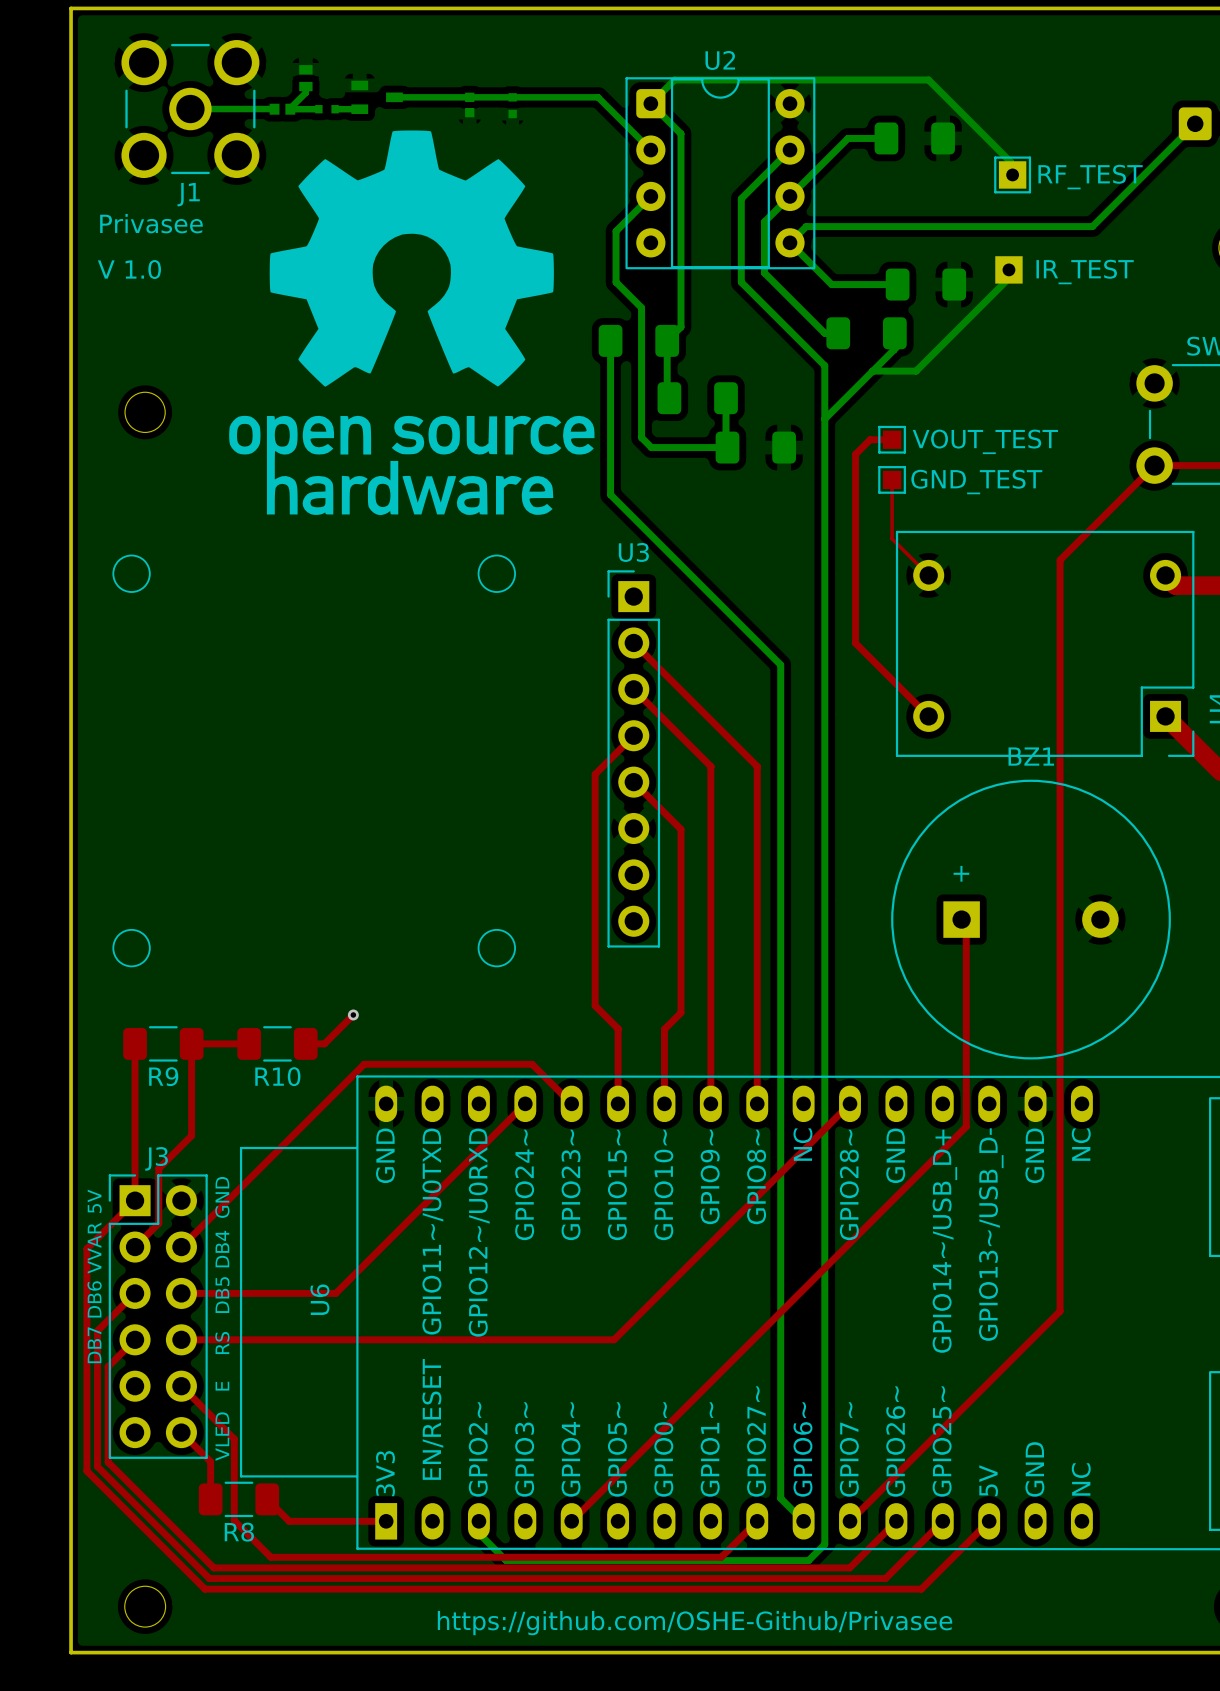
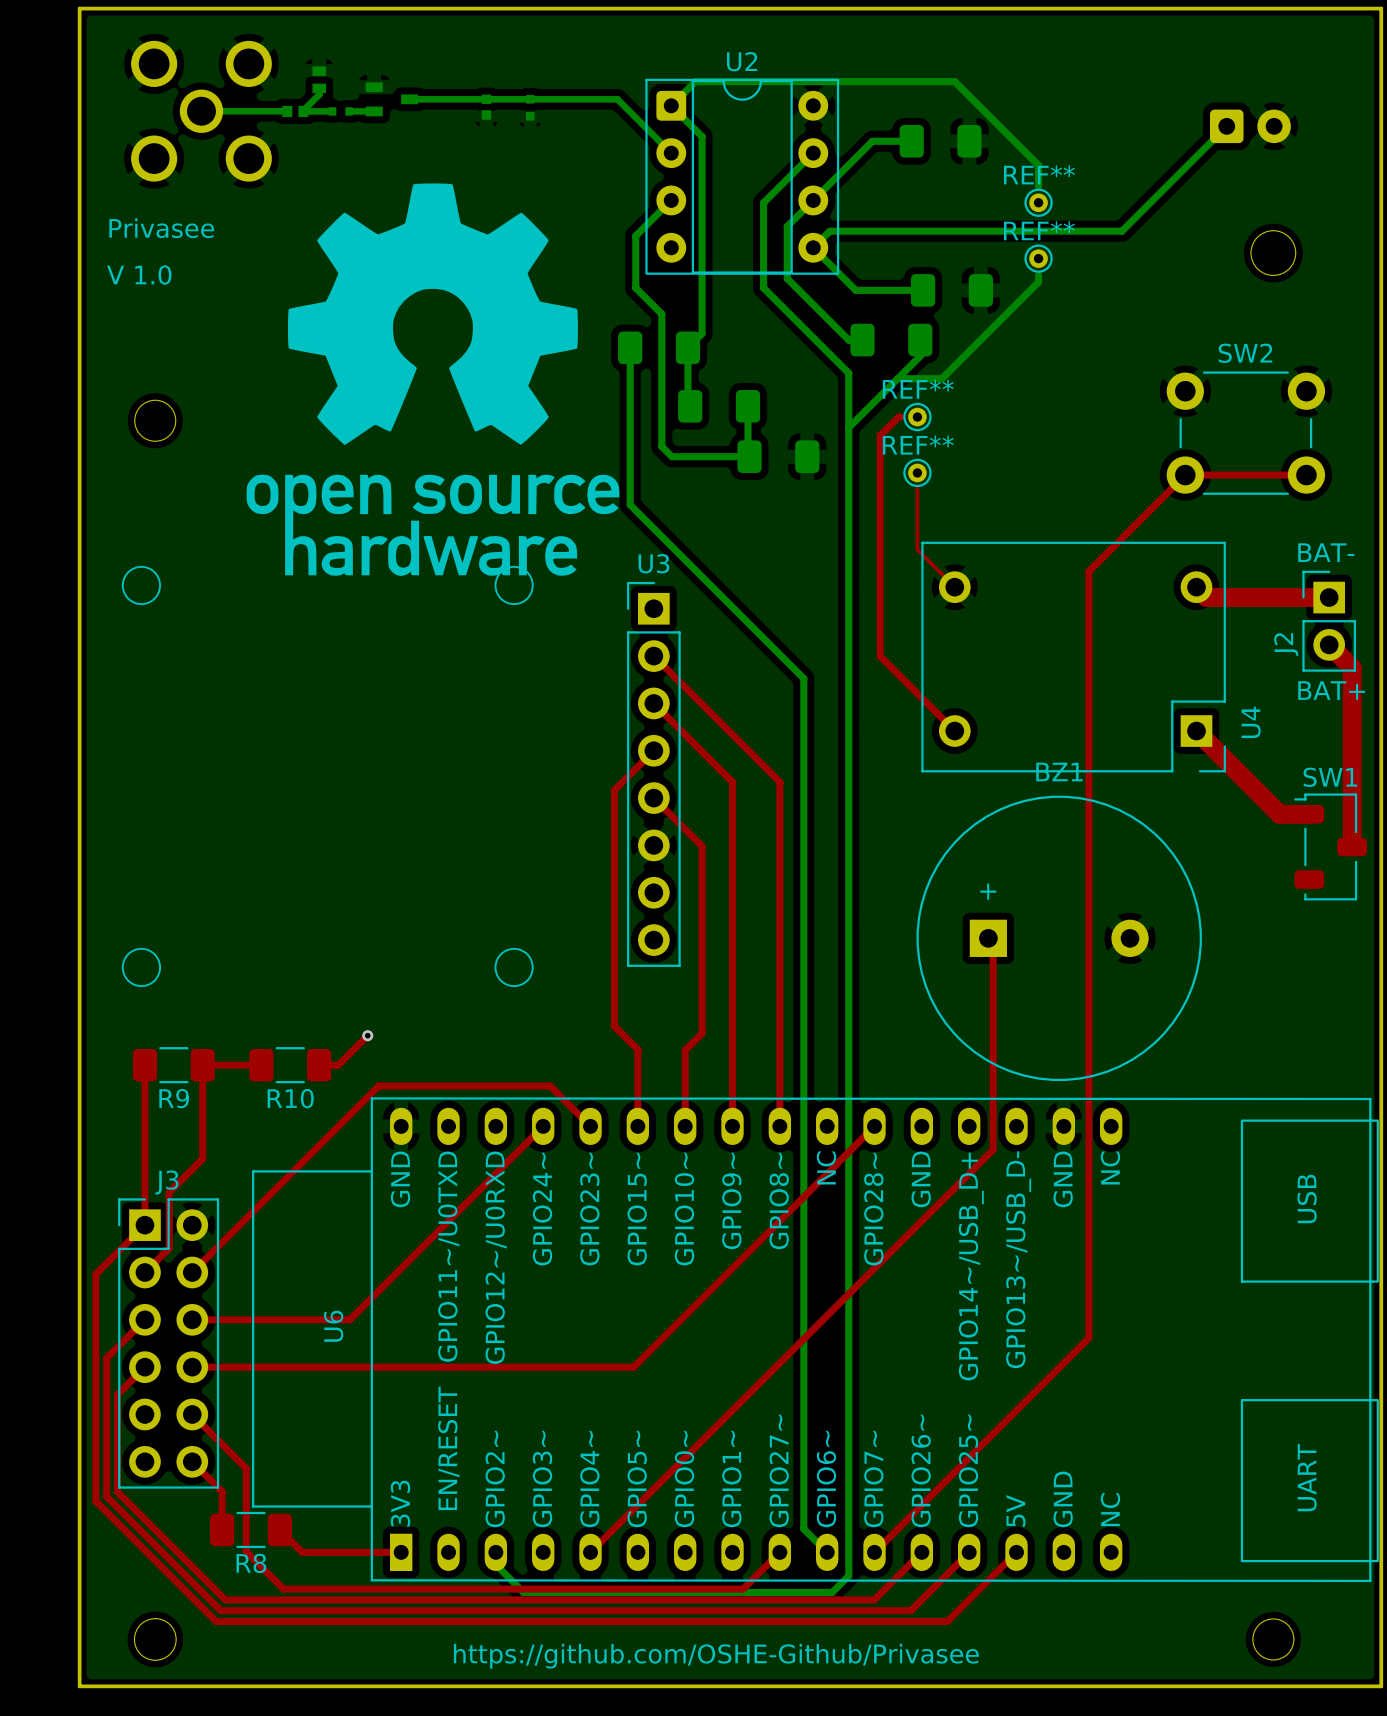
J1 side: top (190, 109) -> bottom (201, 111)
part: RF_TEST (1012, 174) -> none
REF**: none -> (1038, 202)
REF**: none -> (1038, 258)
part: IR_TEST (1008, 269) -> none
drawing position: (411, 322) -> (432, 379)
REF**: none -> (917, 417)
top track: (892, 439) (870, 439) (855, 454) -> (900, 417) (880, 435) (880, 463)
part: VOUT_TEST (892, 439) -> none
REF**: none -> (917, 472)
part: GND_TEST (892, 479) -> none
J3 footprint: [108, 1174, 208, 1459] -> [118, 1198, 220, 1489]

